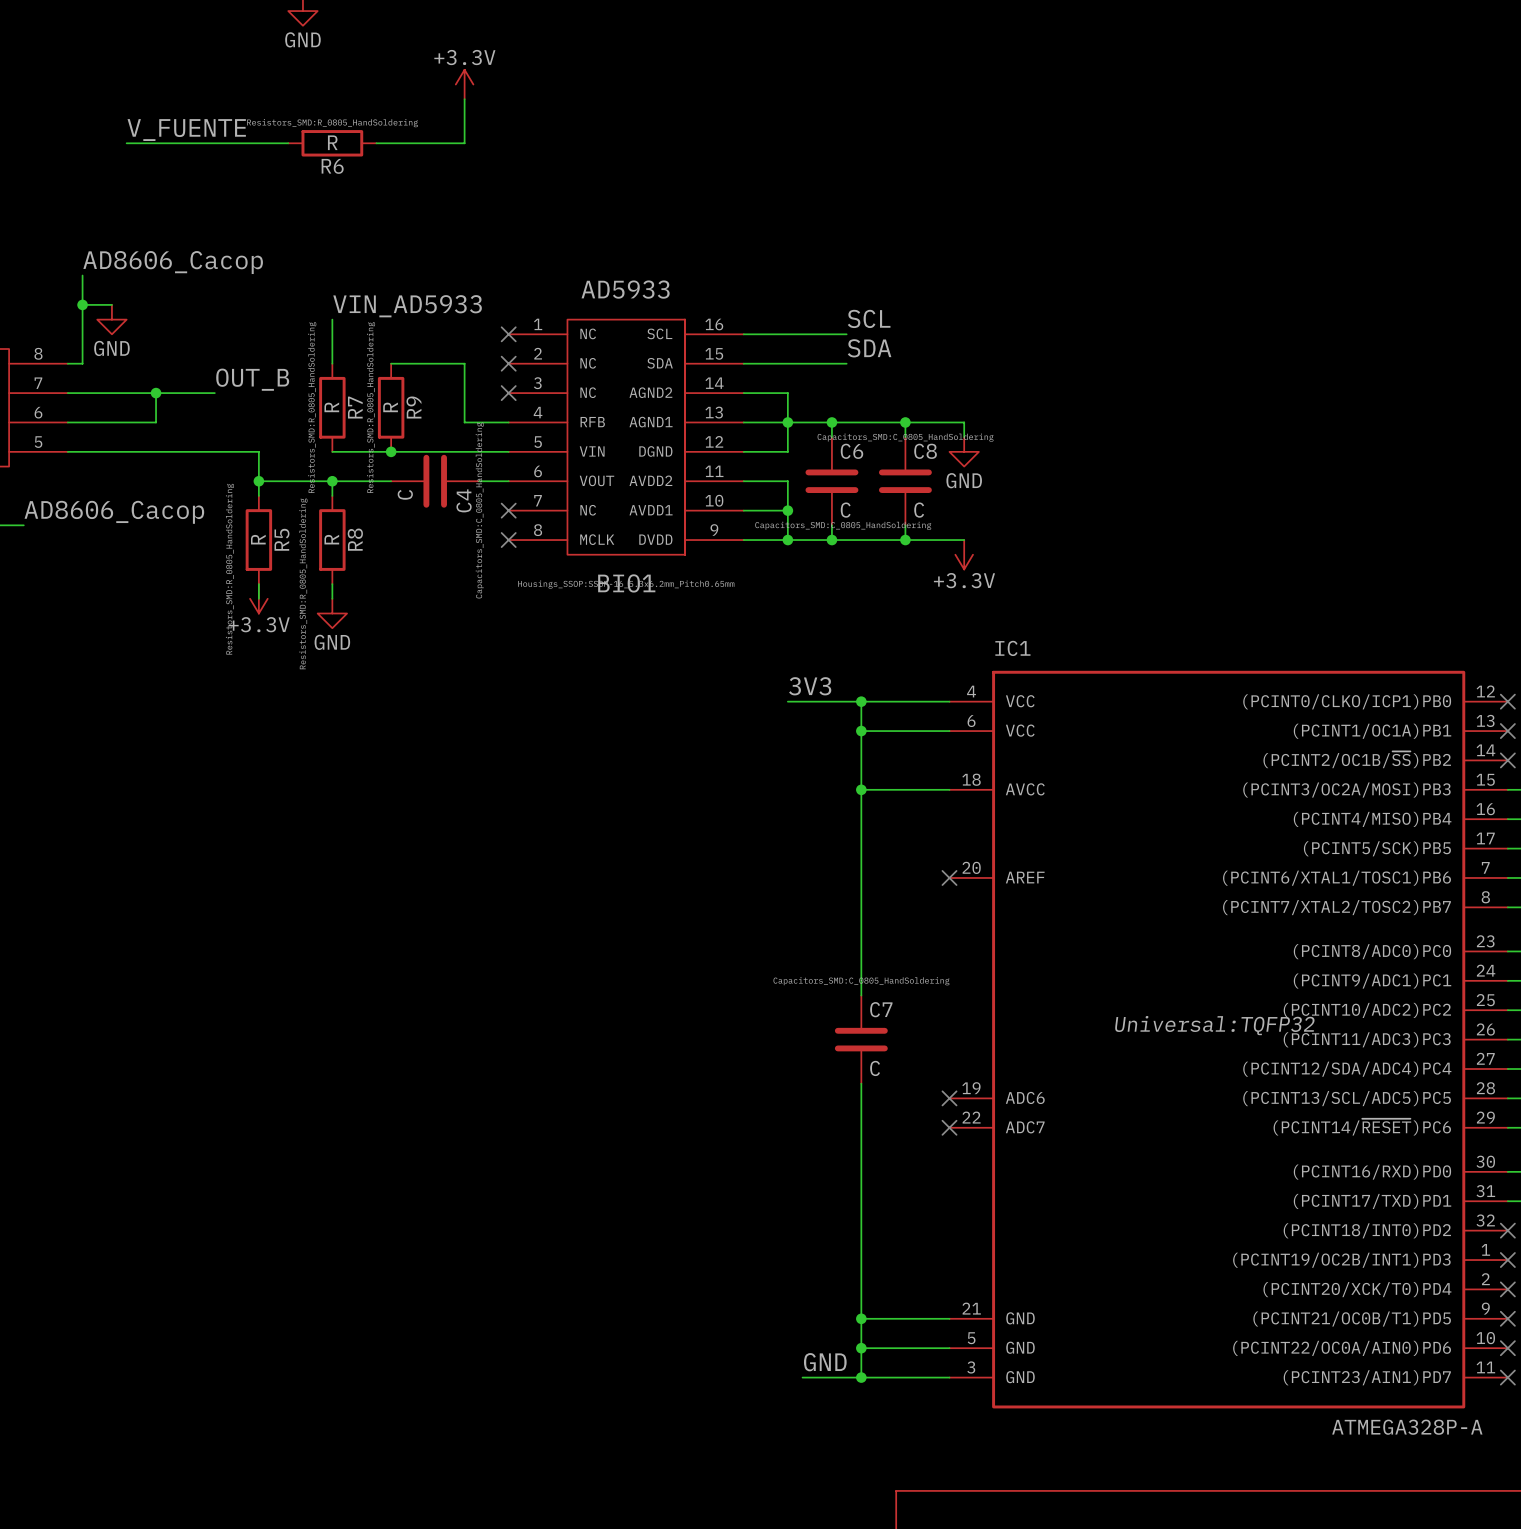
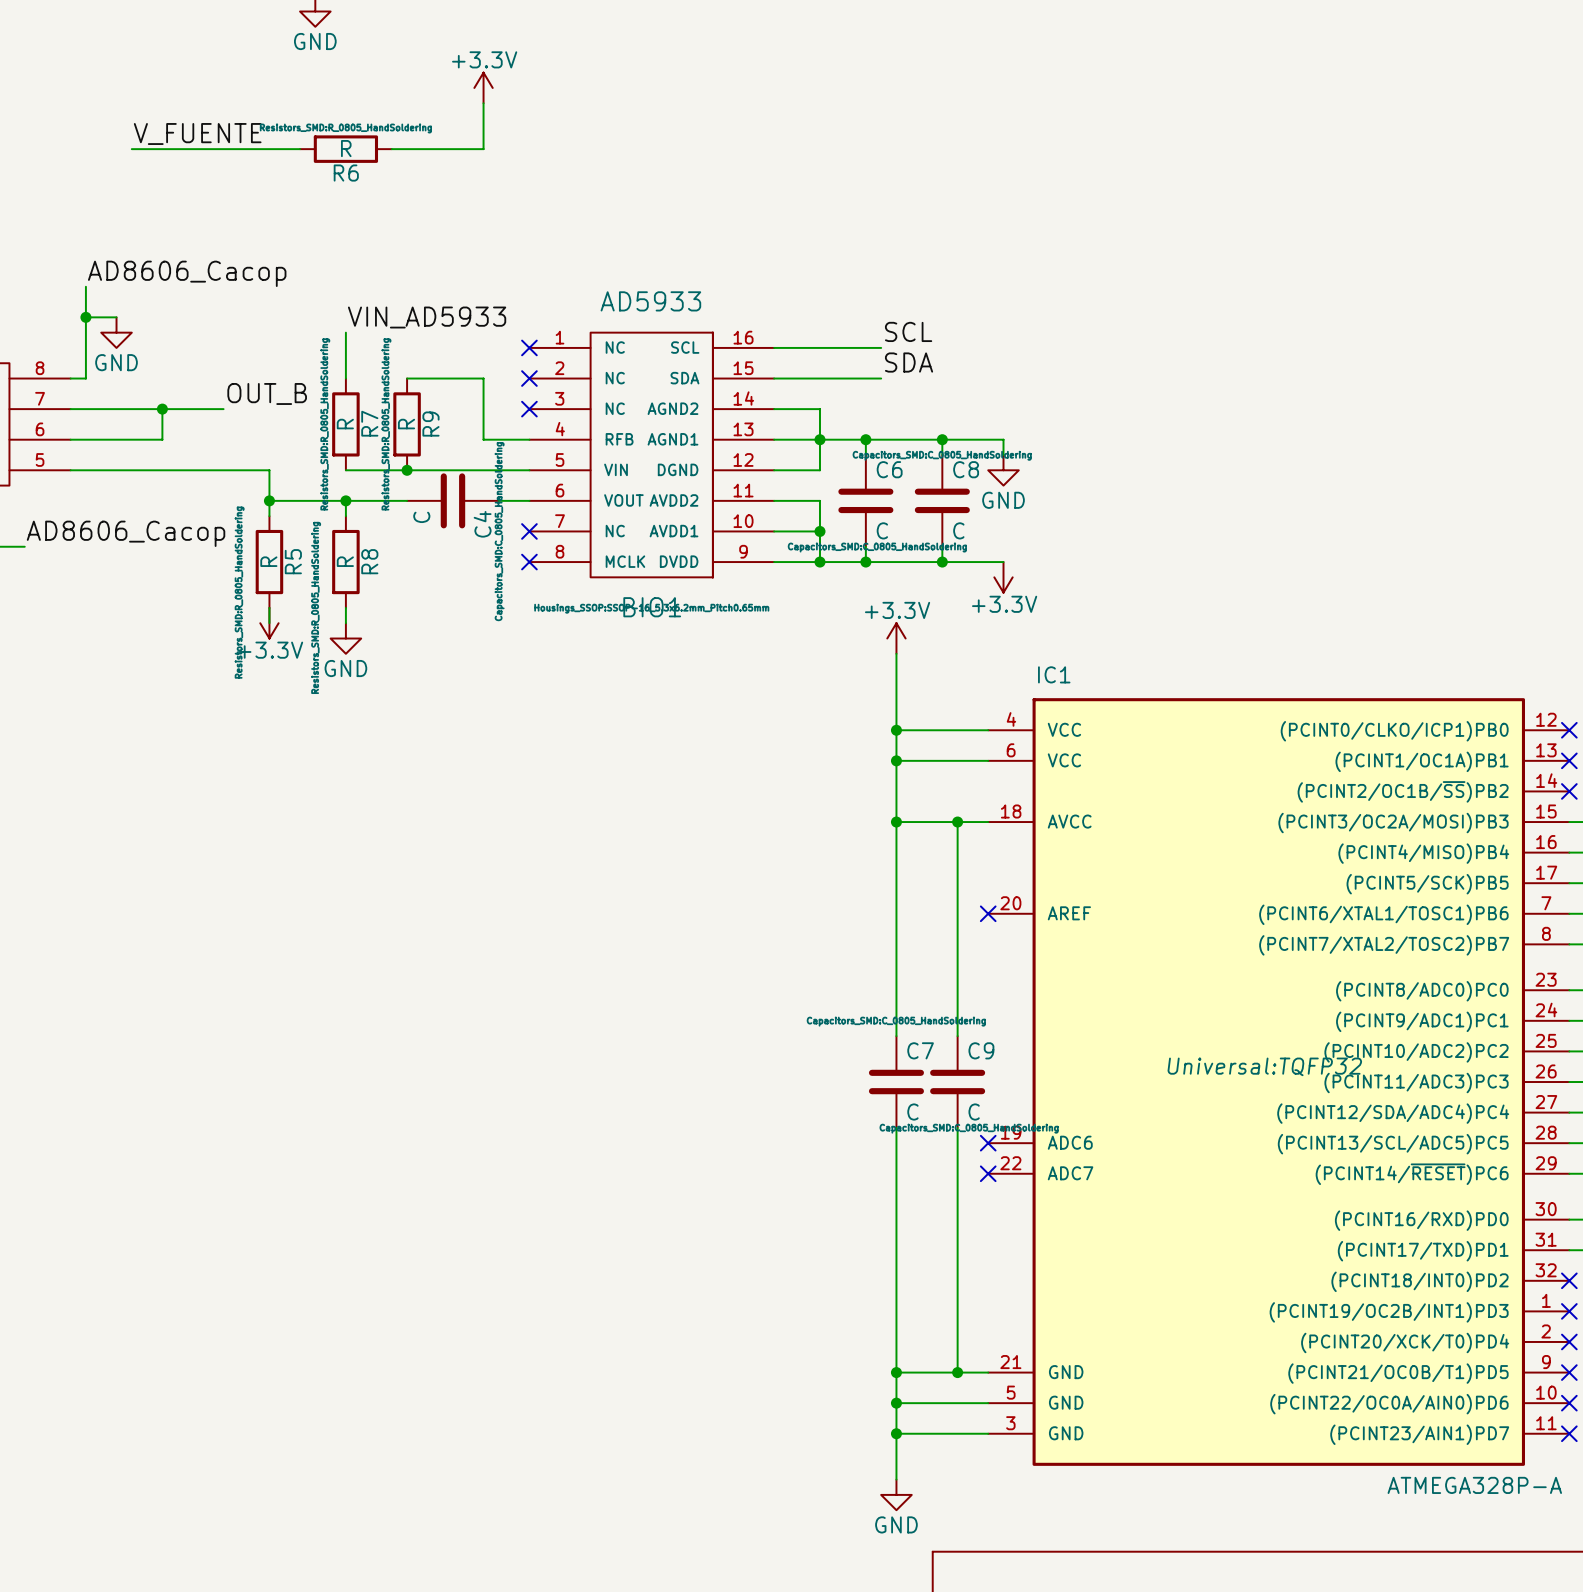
power symbol: none -> +3.3V (896, 638)
label: 3V3 (810, 686) -> none
wire: (787, 701) (861, 701) -> (896, 653) (896, 730)
wire: none -> (957, 822) (957, 1036)
junction: none -> (957, 822)
C9: none -> C (957, 1082)
wire: none -> (957, 1127) (957, 1372)
junction: none -> (957, 1372)
label: GND (825, 1362) -> none
wire: (802, 1377) (861, 1377) -> (896, 1479) (896, 1433)
power symbol: none -> GND (896, 1494)

